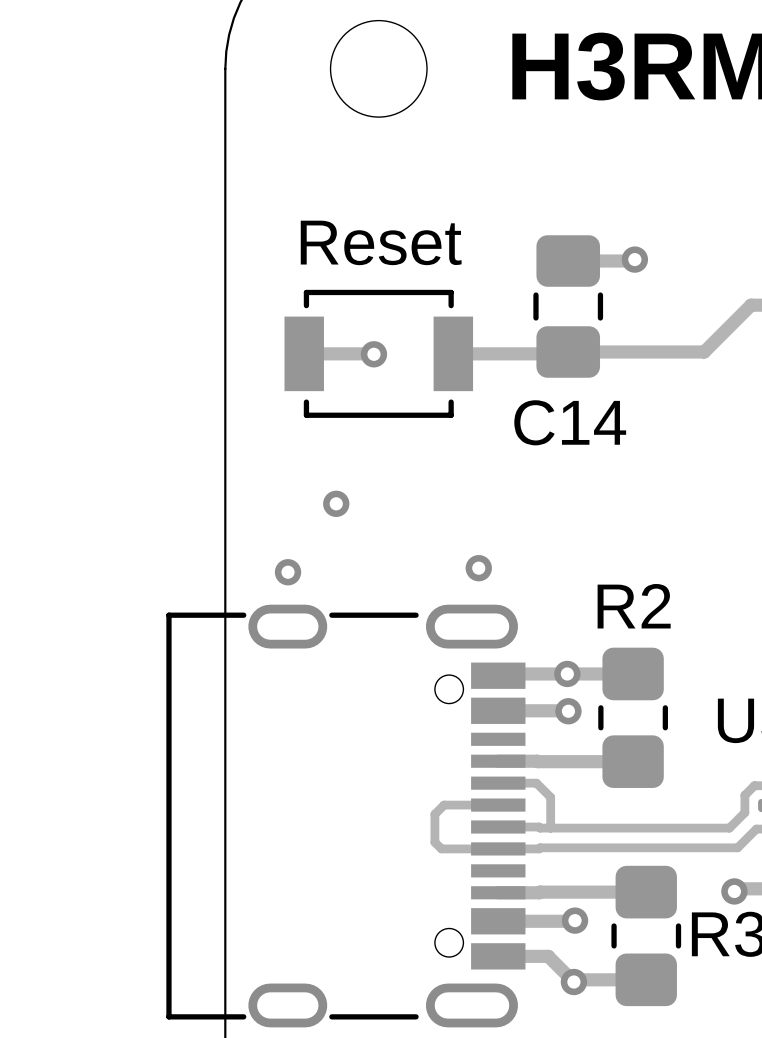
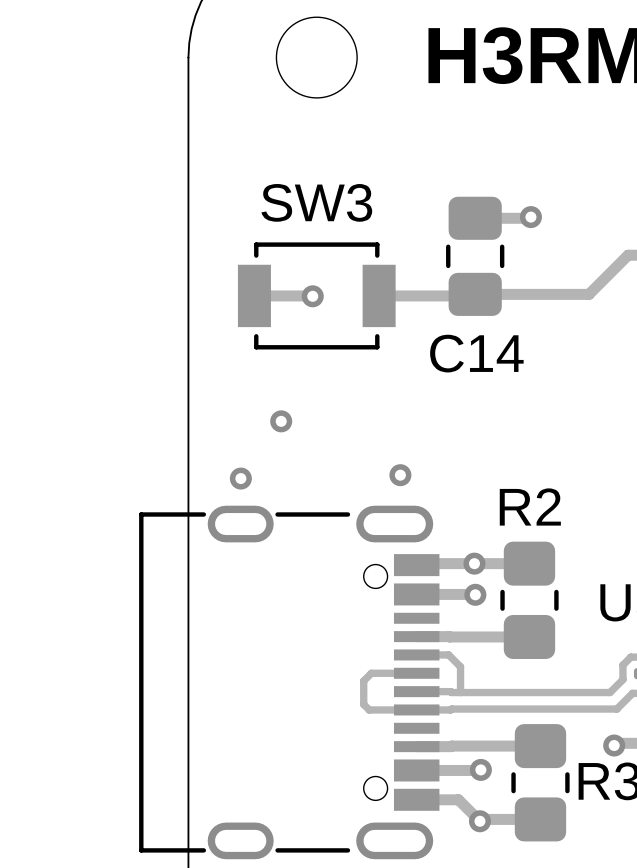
Reset name: Reset (381, 242) -> SW3 (316, 202)

